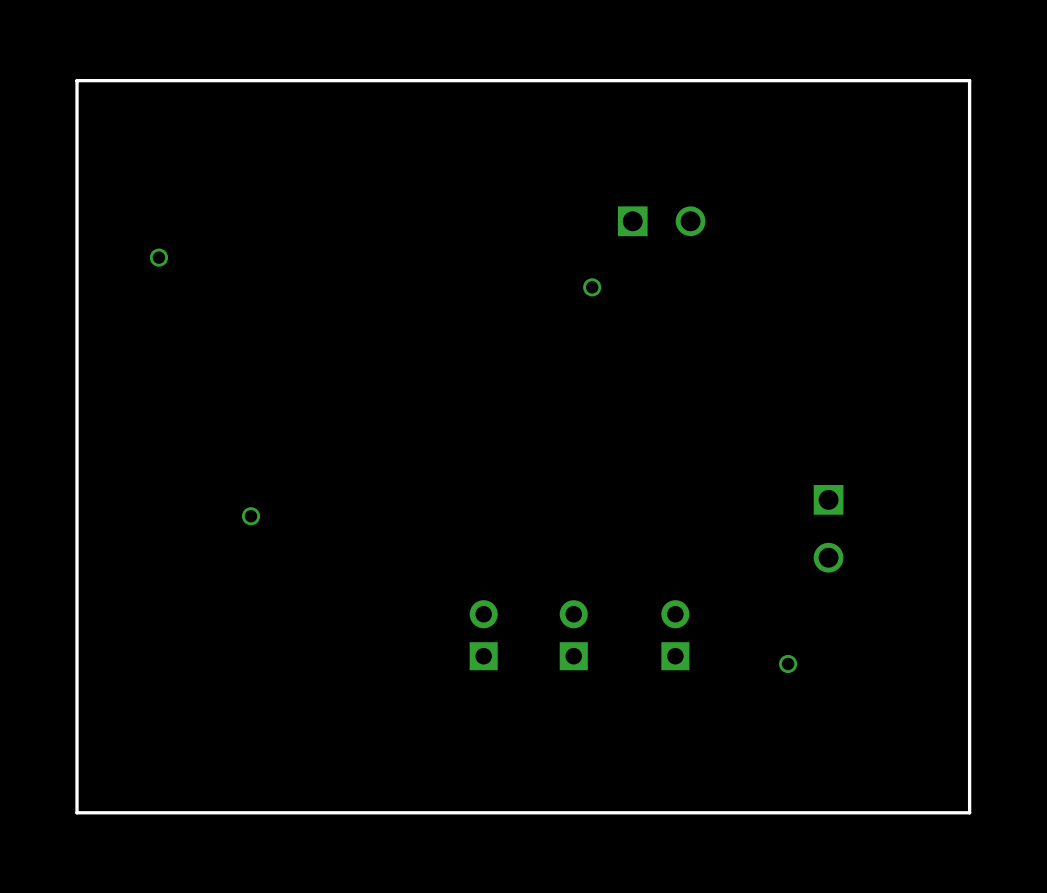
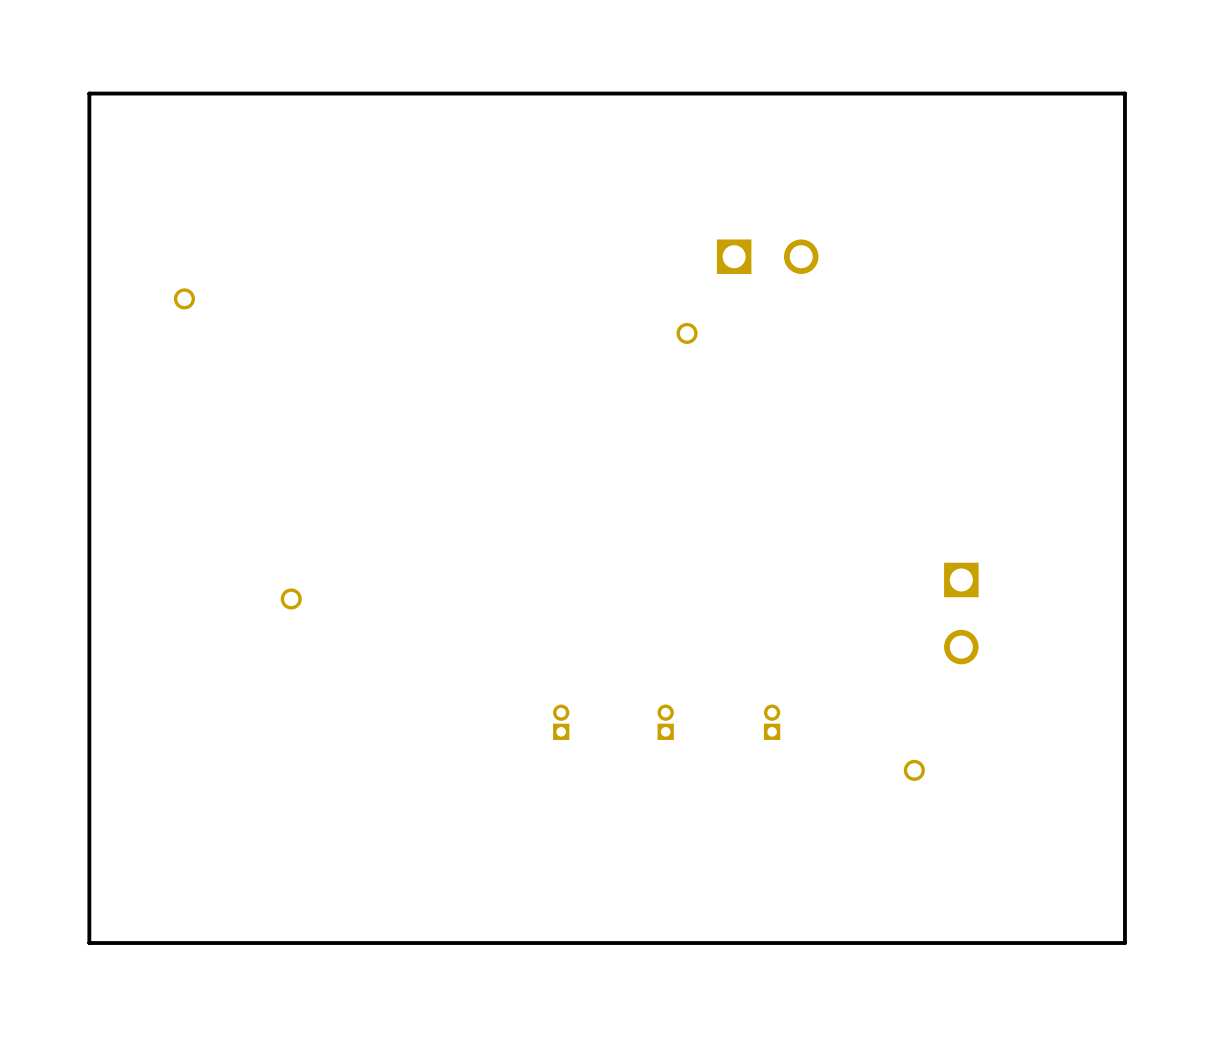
part footprint: [469, 600, 498, 671] -> [553, 704, 570, 740]
part footprint: [559, 600, 588, 671] -> [657, 704, 674, 740]
part footprint: [661, 600, 690, 671] -> [763, 704, 781, 740]

